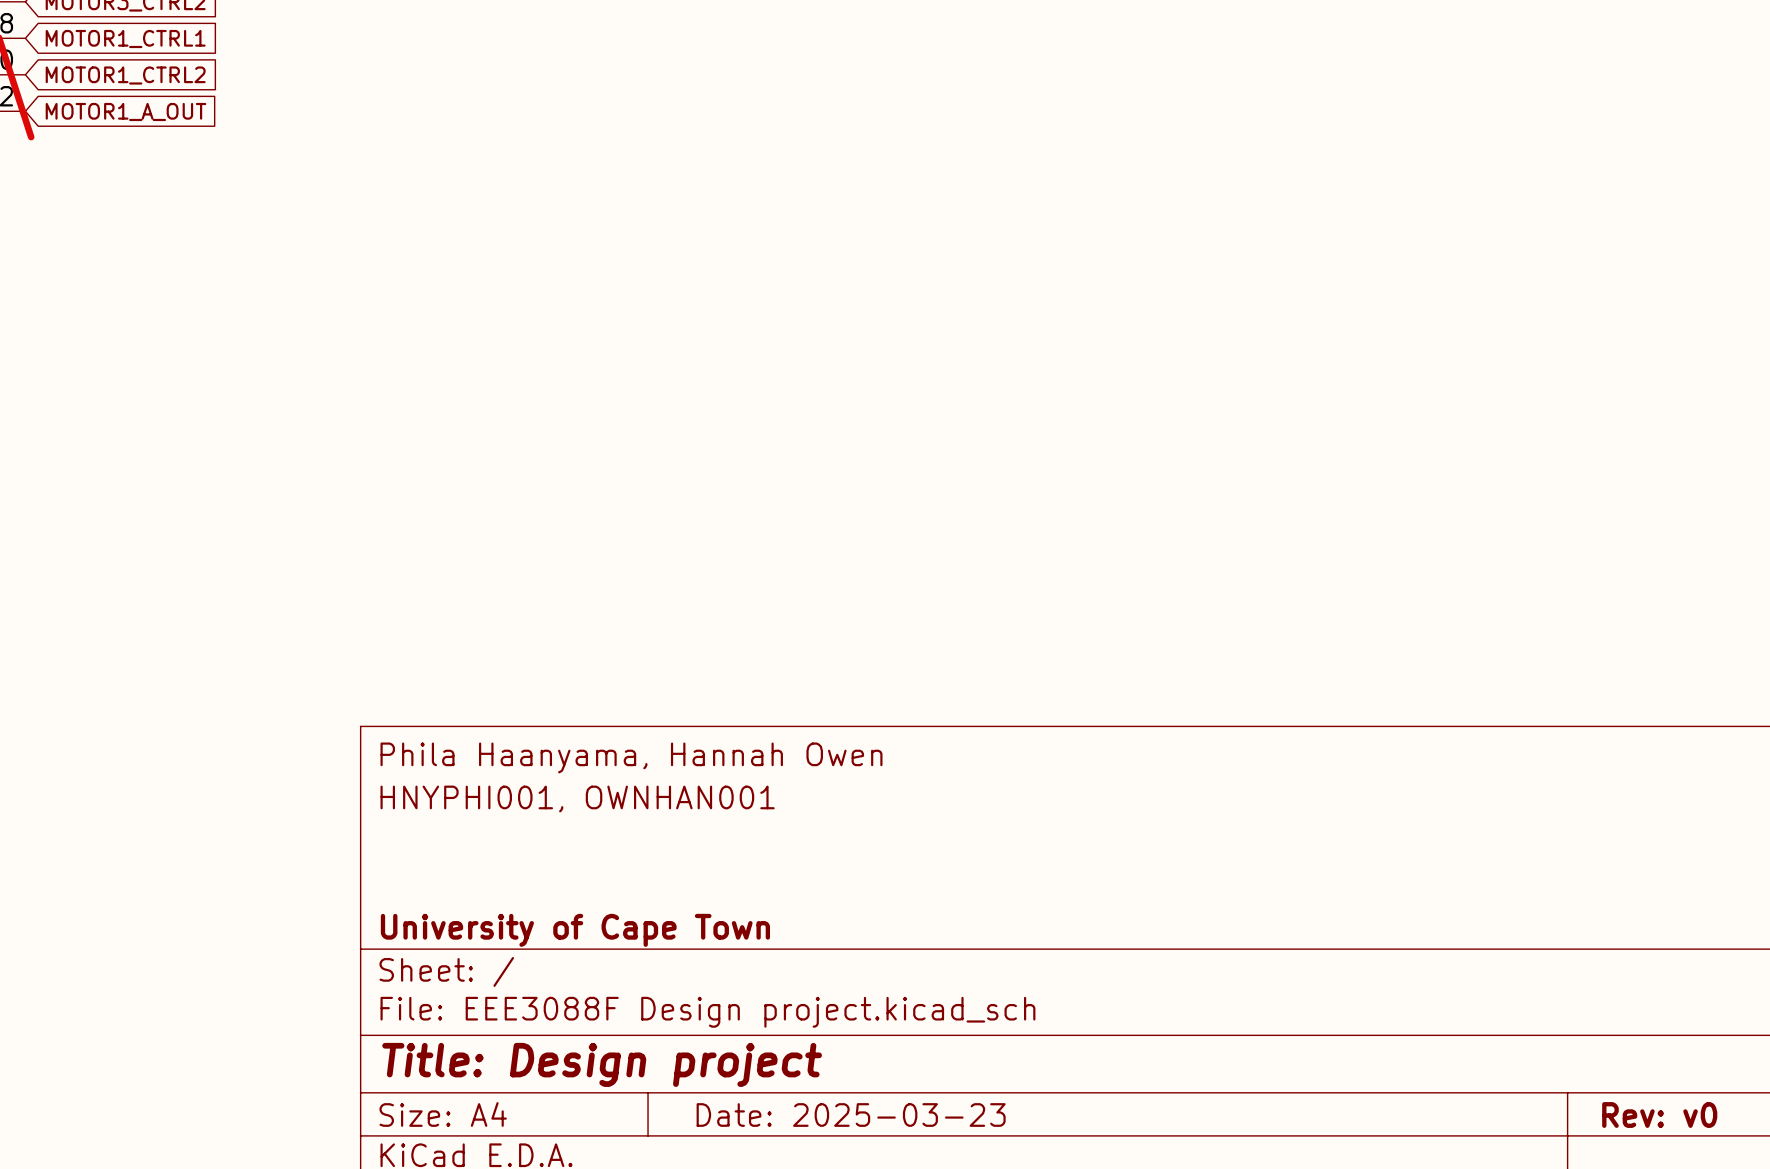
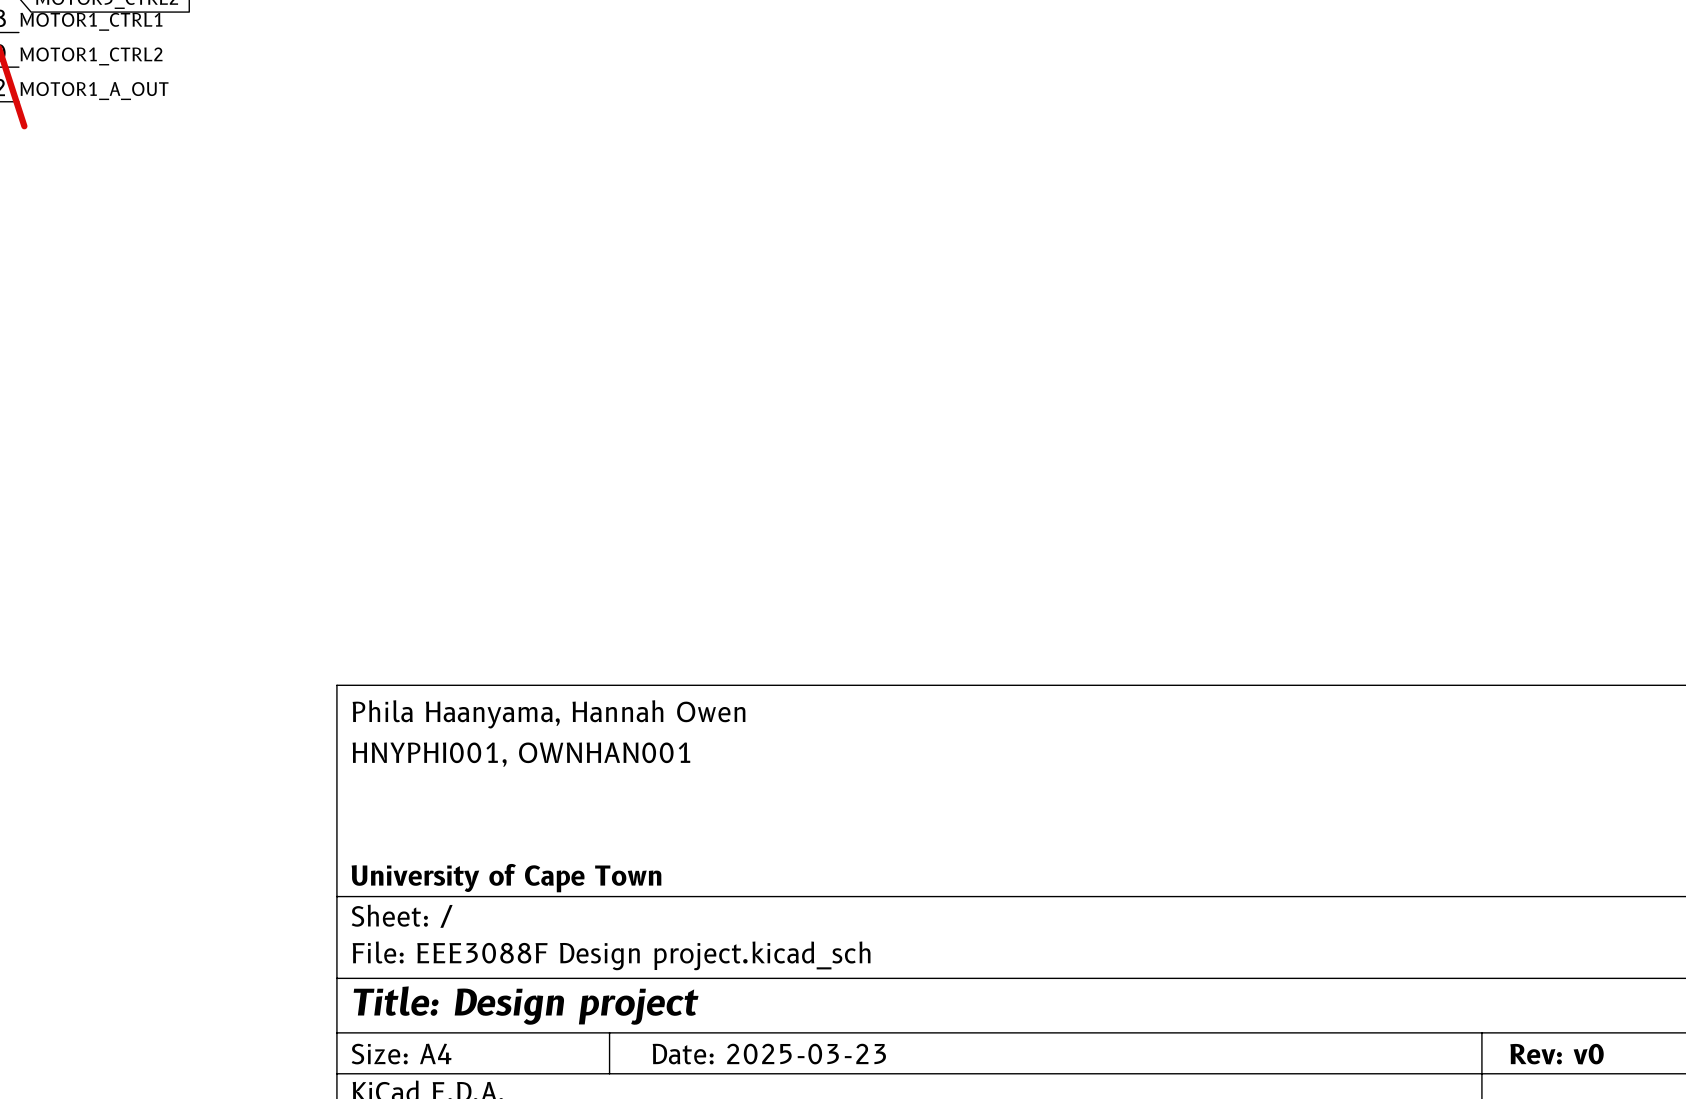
label: none -> MOTOR1_CTRL1 (91, 21)
global label: MOTOR1_CTRL1 (125, 39) -> none
label: none -> MOTOR1_CTRL2 (91, 56)
global label: MOTOR1_CTRL2 (125, 75) -> none
label: none -> MOTOR1_A_OUT (94, 91)
global label: MOTOR1_A_OUT (126, 111) -> none

